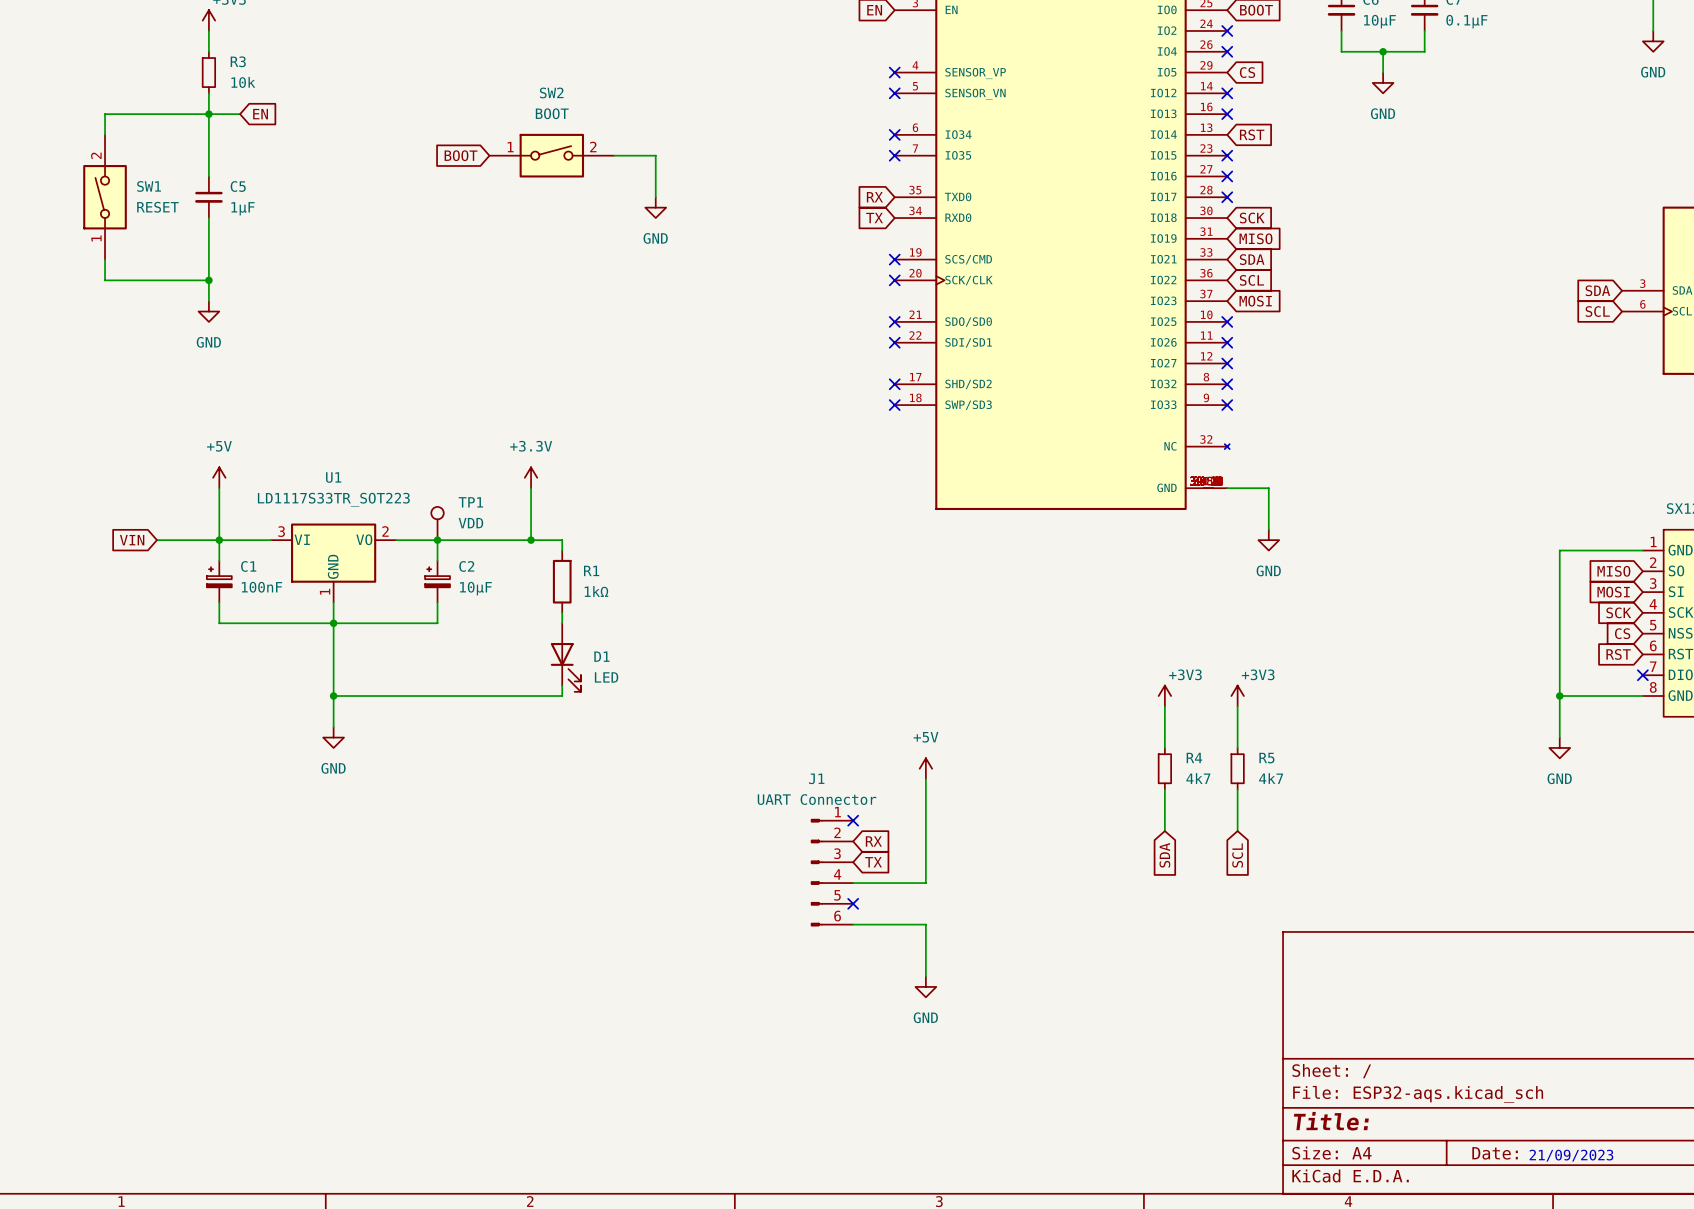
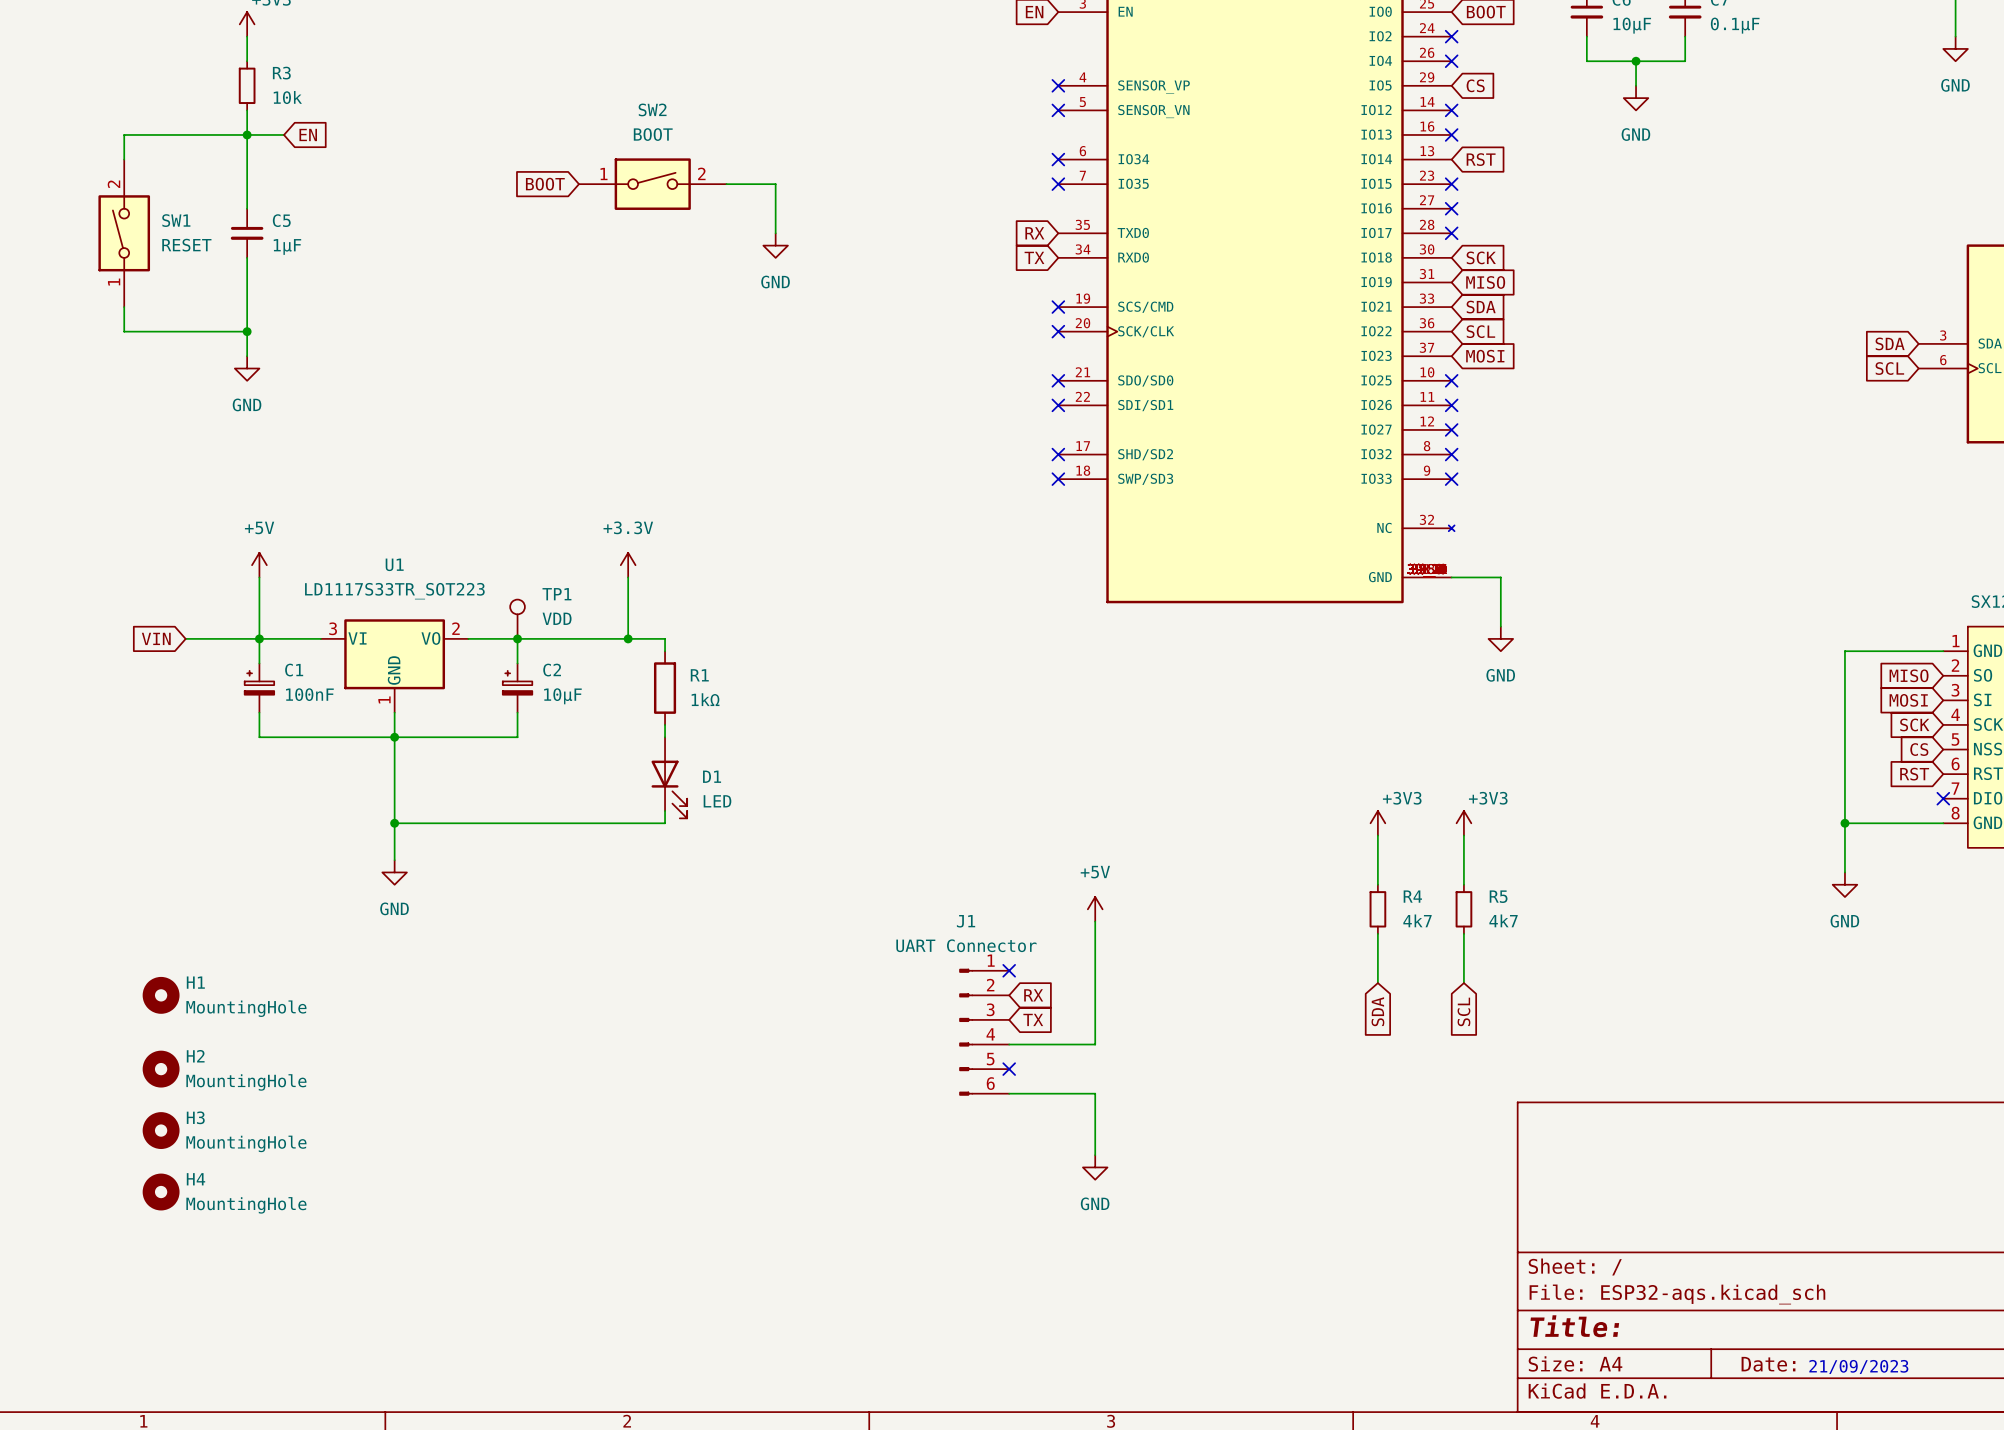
H1: none -> MountingHole (161, 995)
H2: none -> MountingHole (161, 1069)
H3: none -> MountingHole (161, 1130)
H4: none -> MountingHole (161, 1192)

